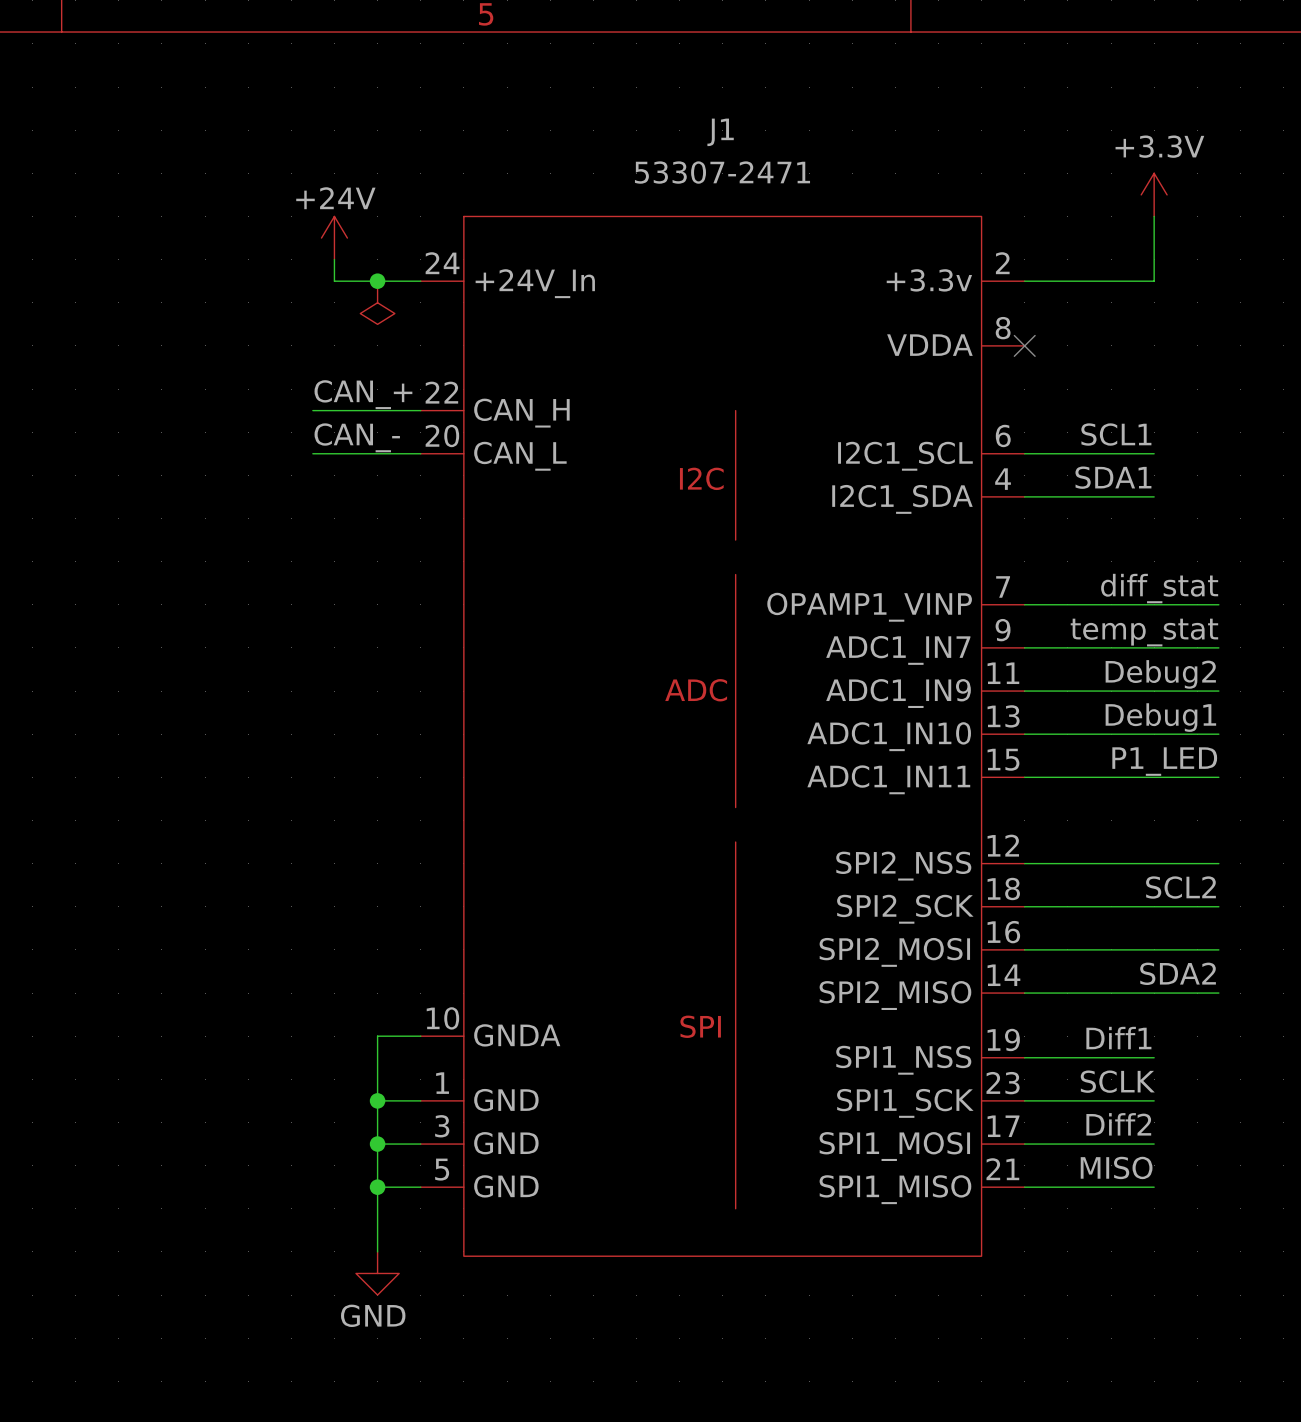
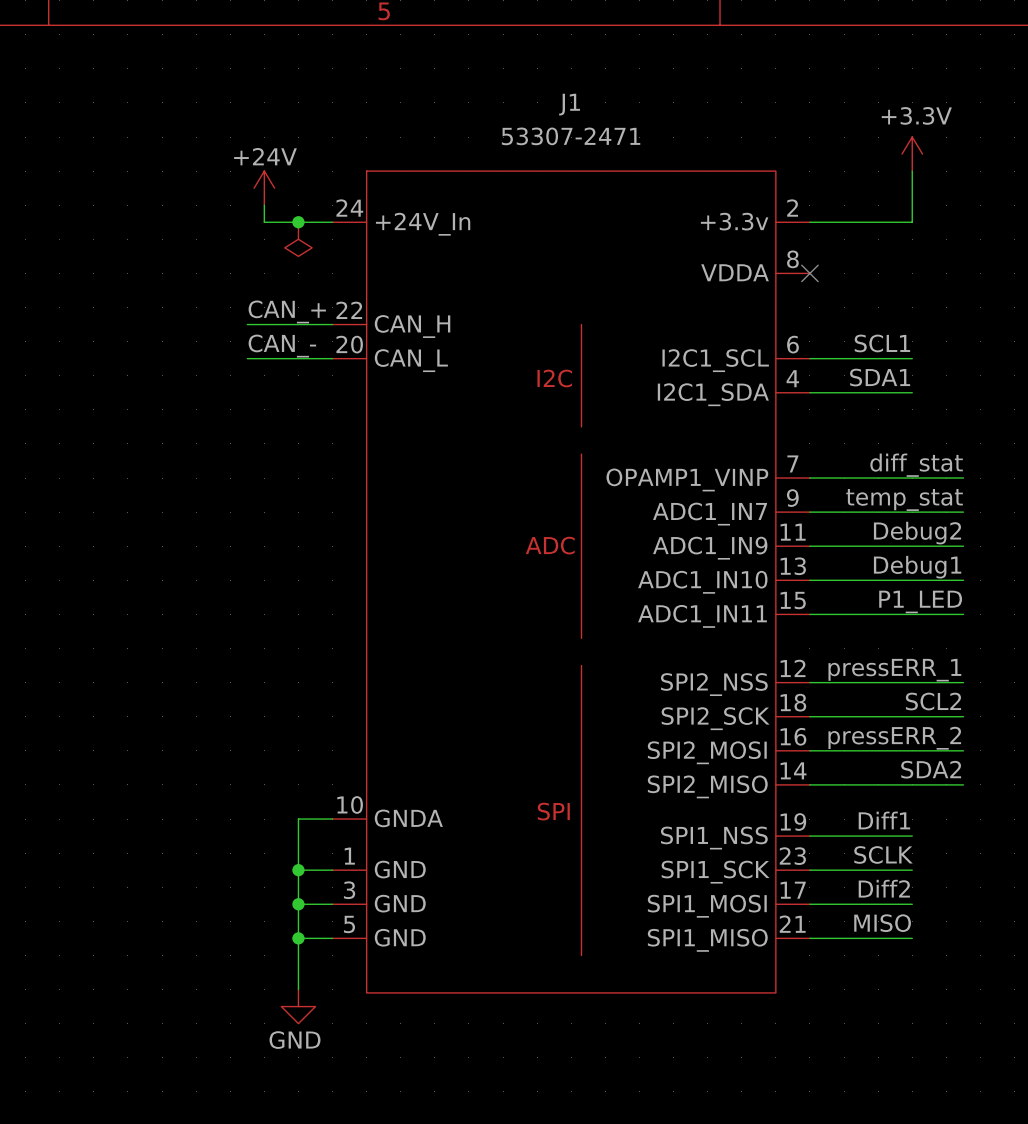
label: none -> pressERR_1 (894, 670)
label: none -> pressERR_2 (894, 738)

